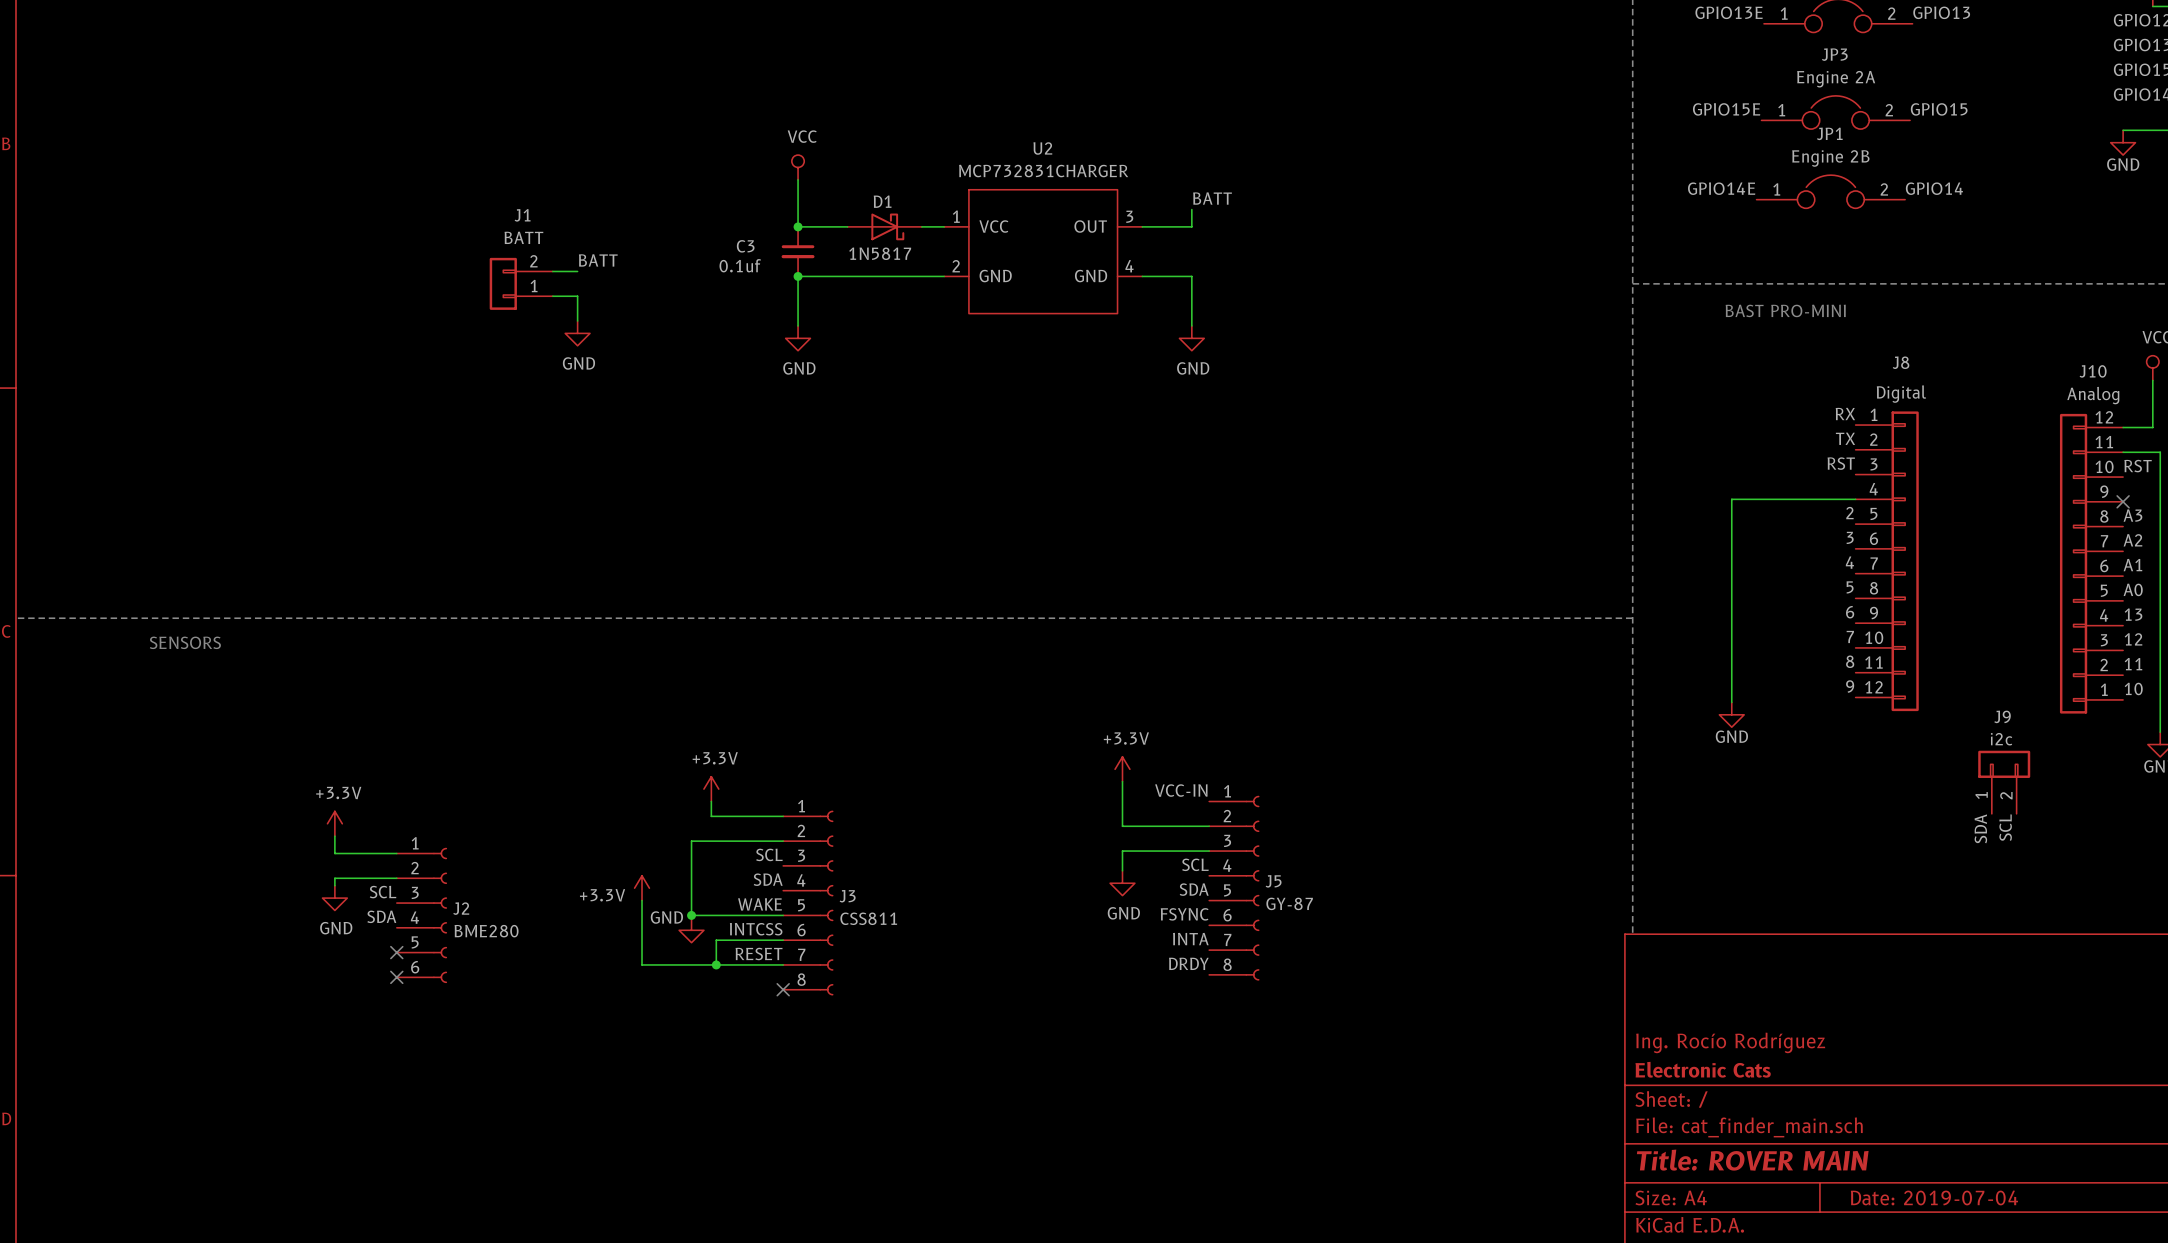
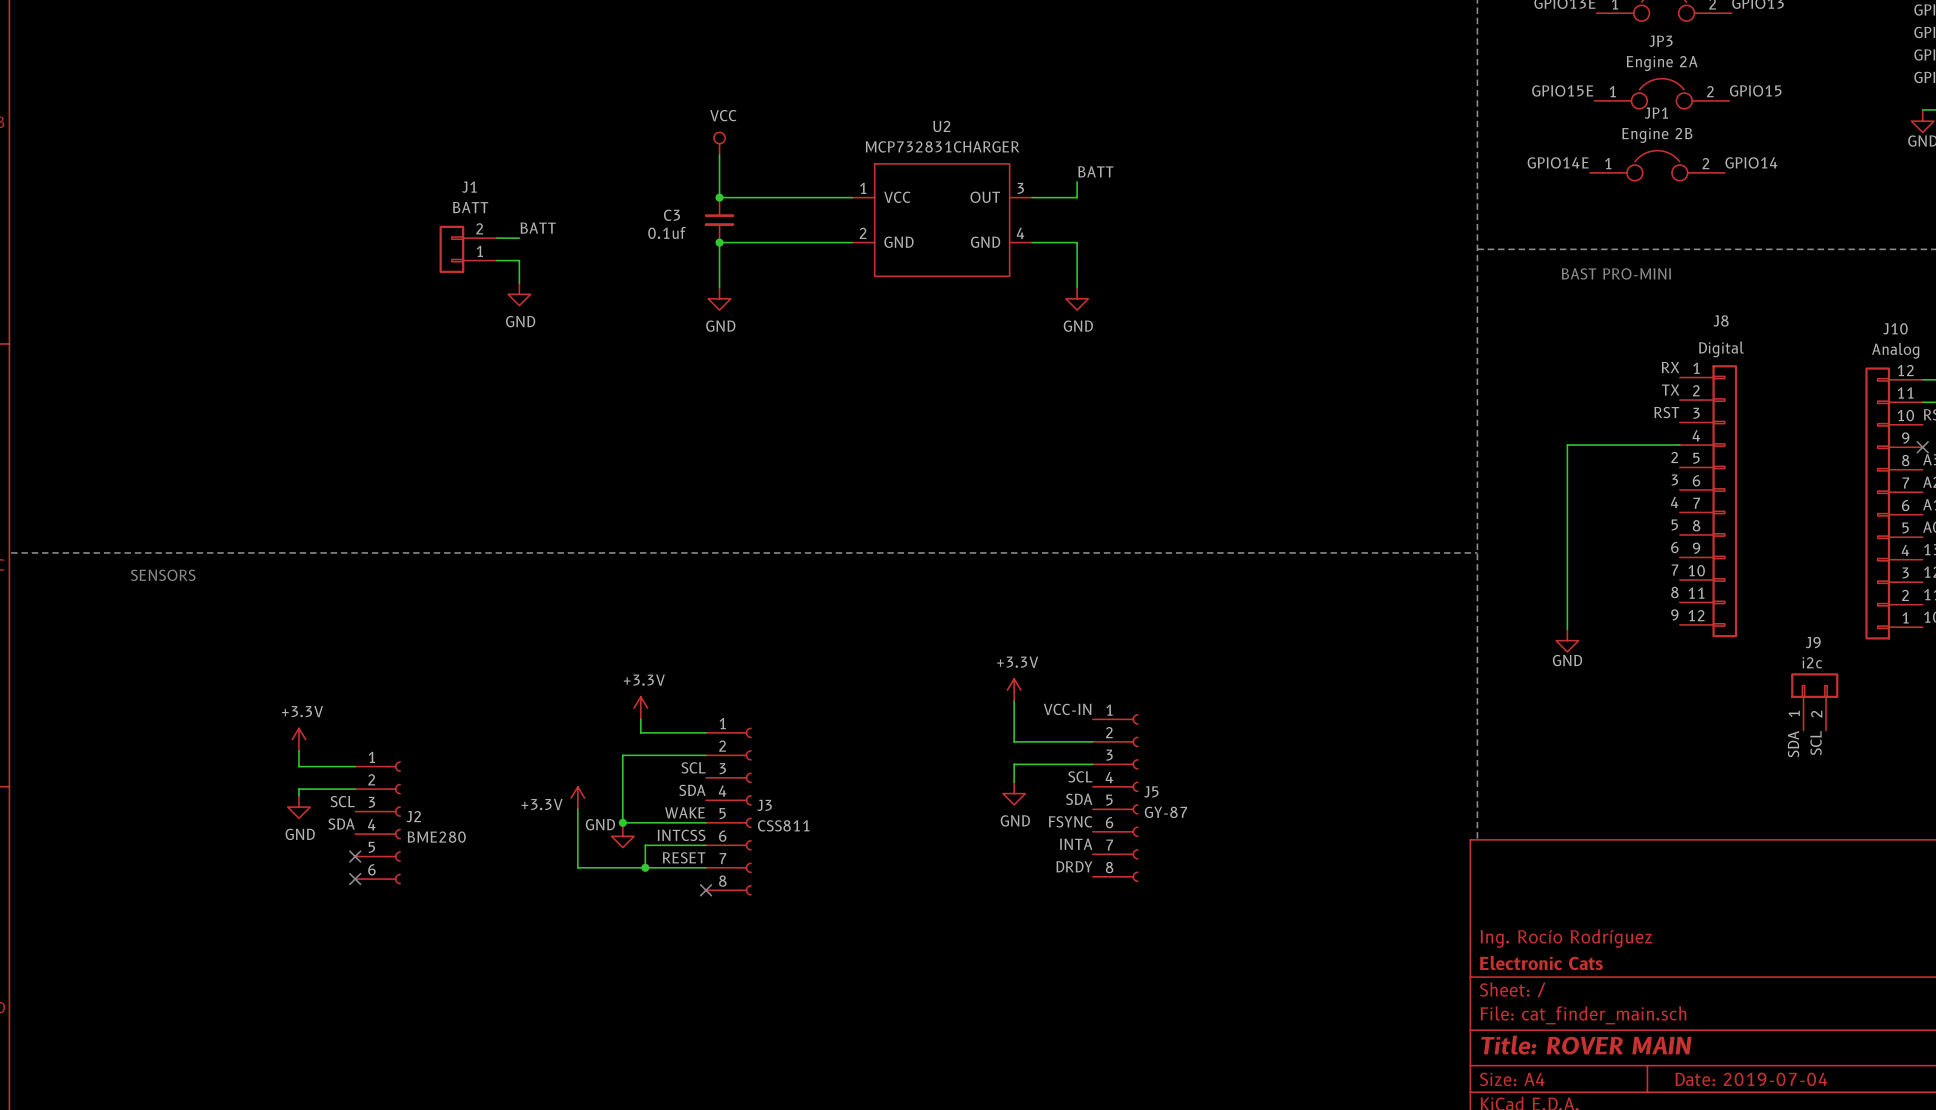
D1: 1N5817 (884, 226) -> none

